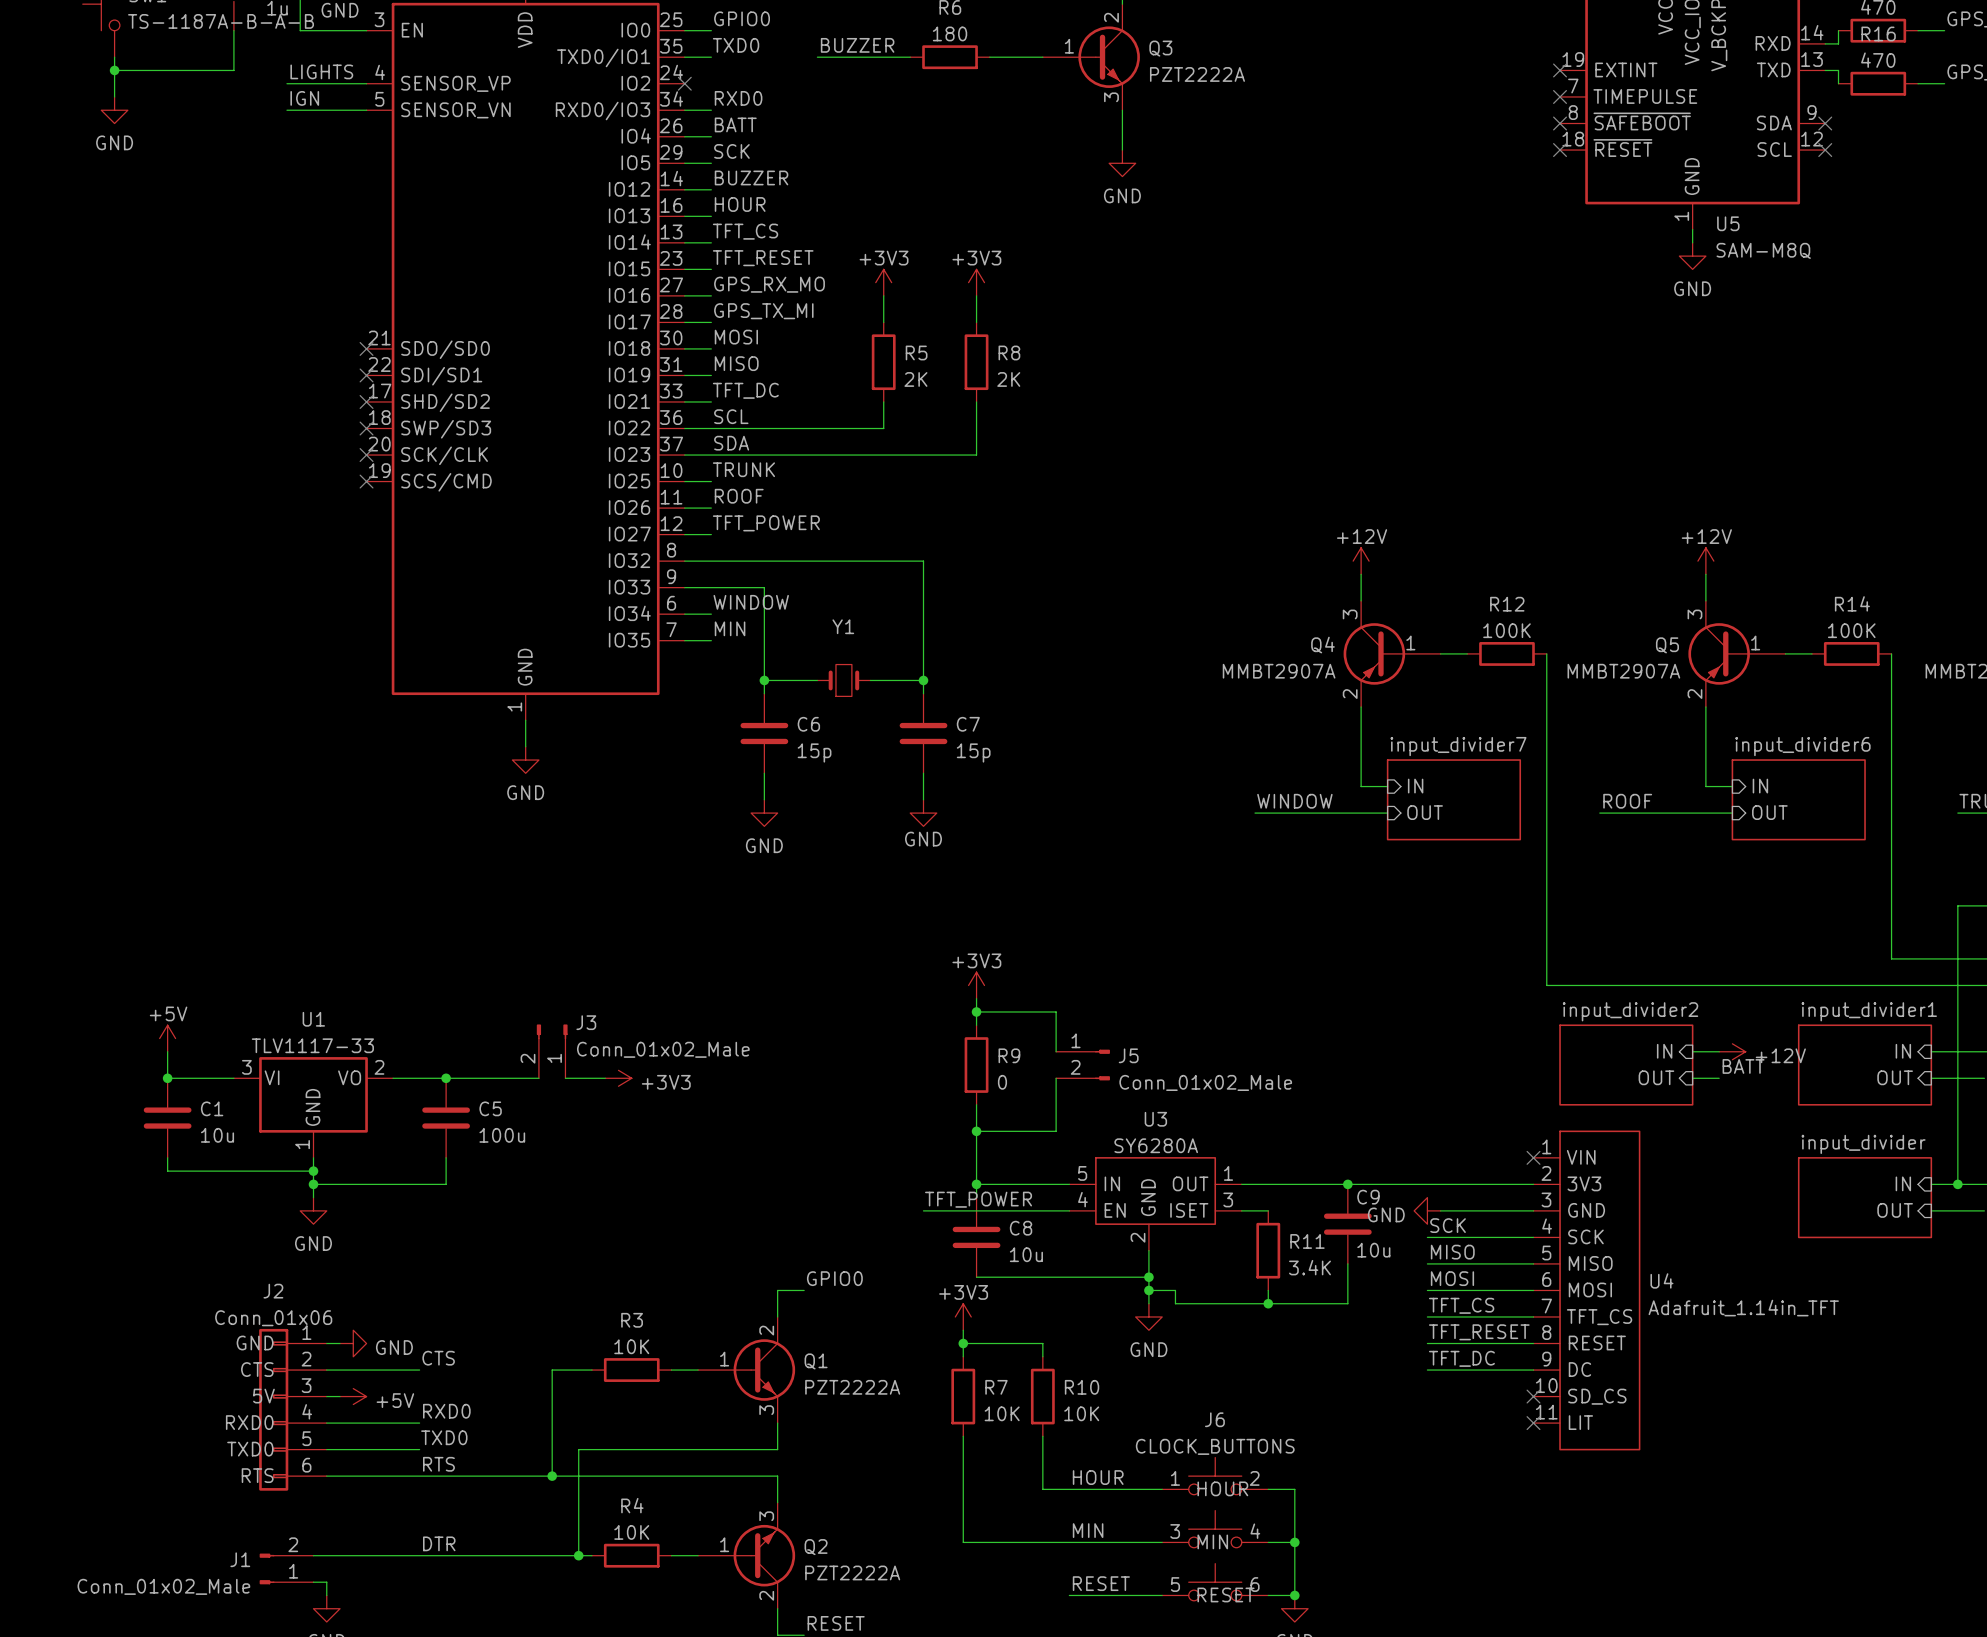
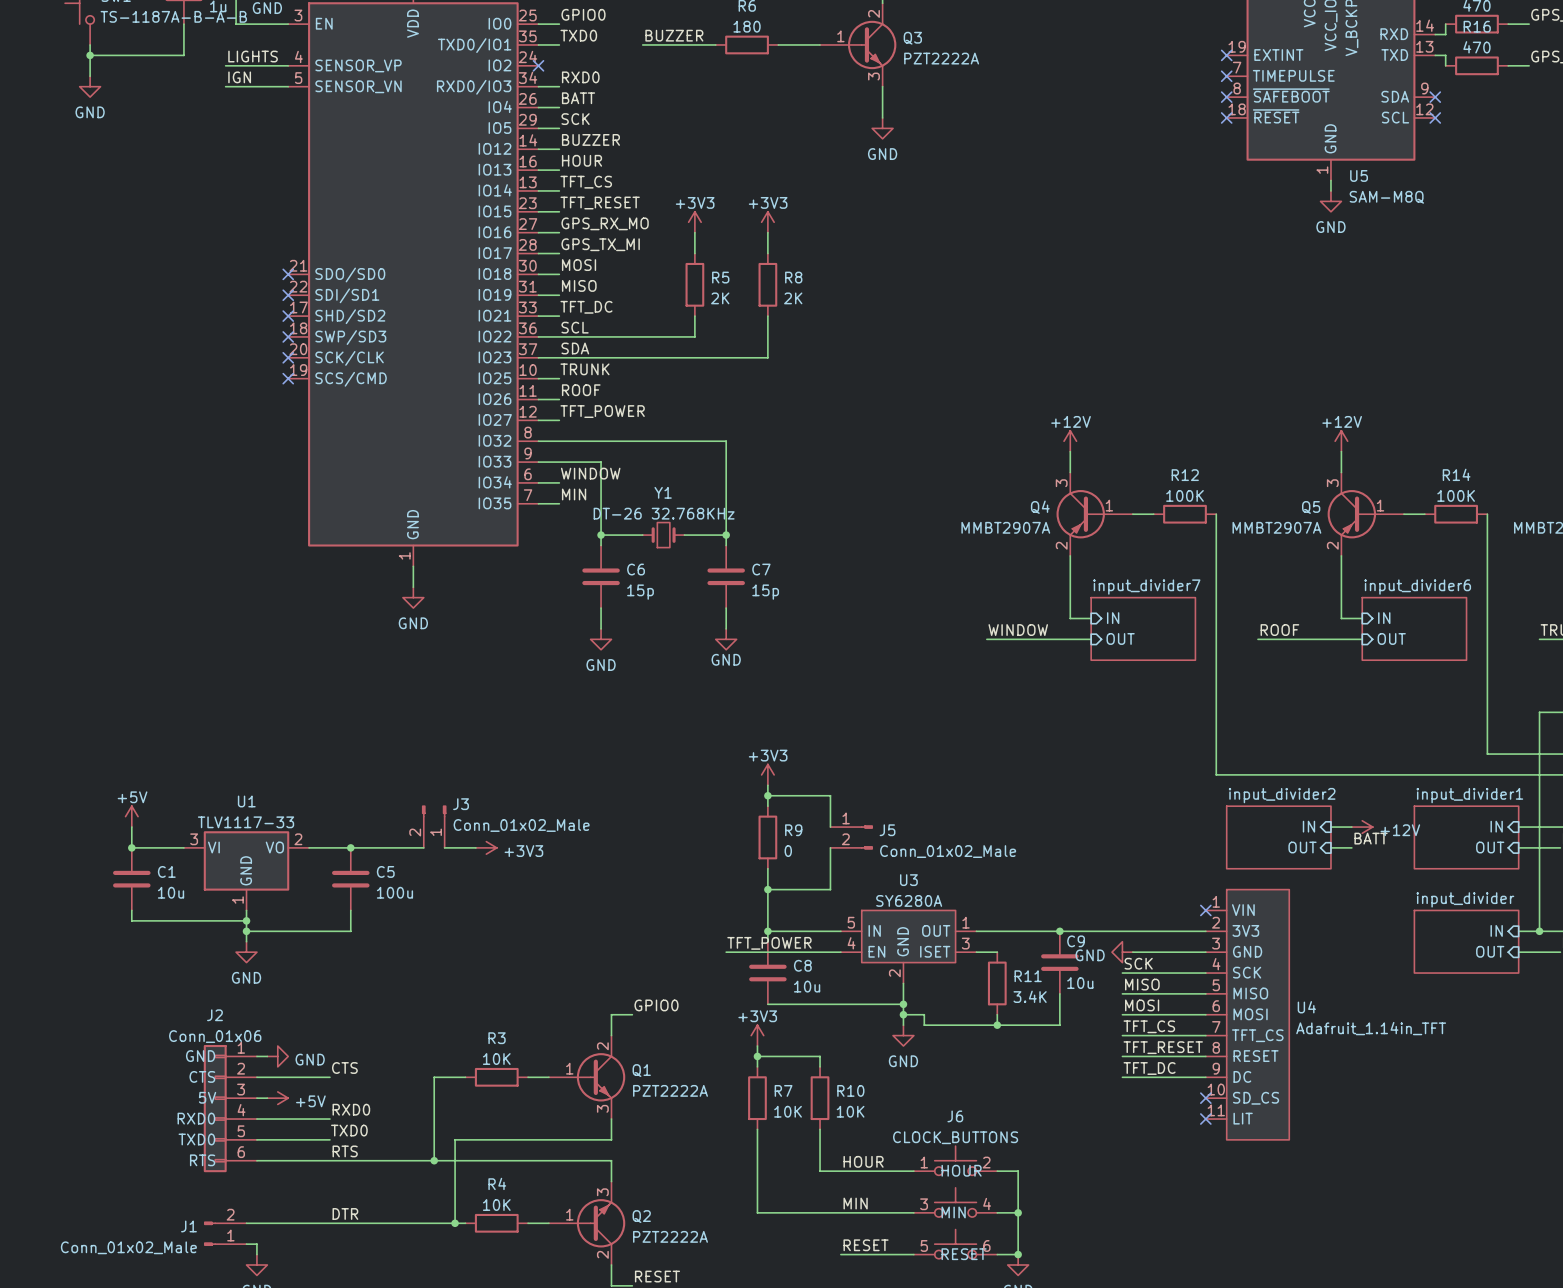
Y1 value: none -> DT-26 32.768KHz (664, 513)

